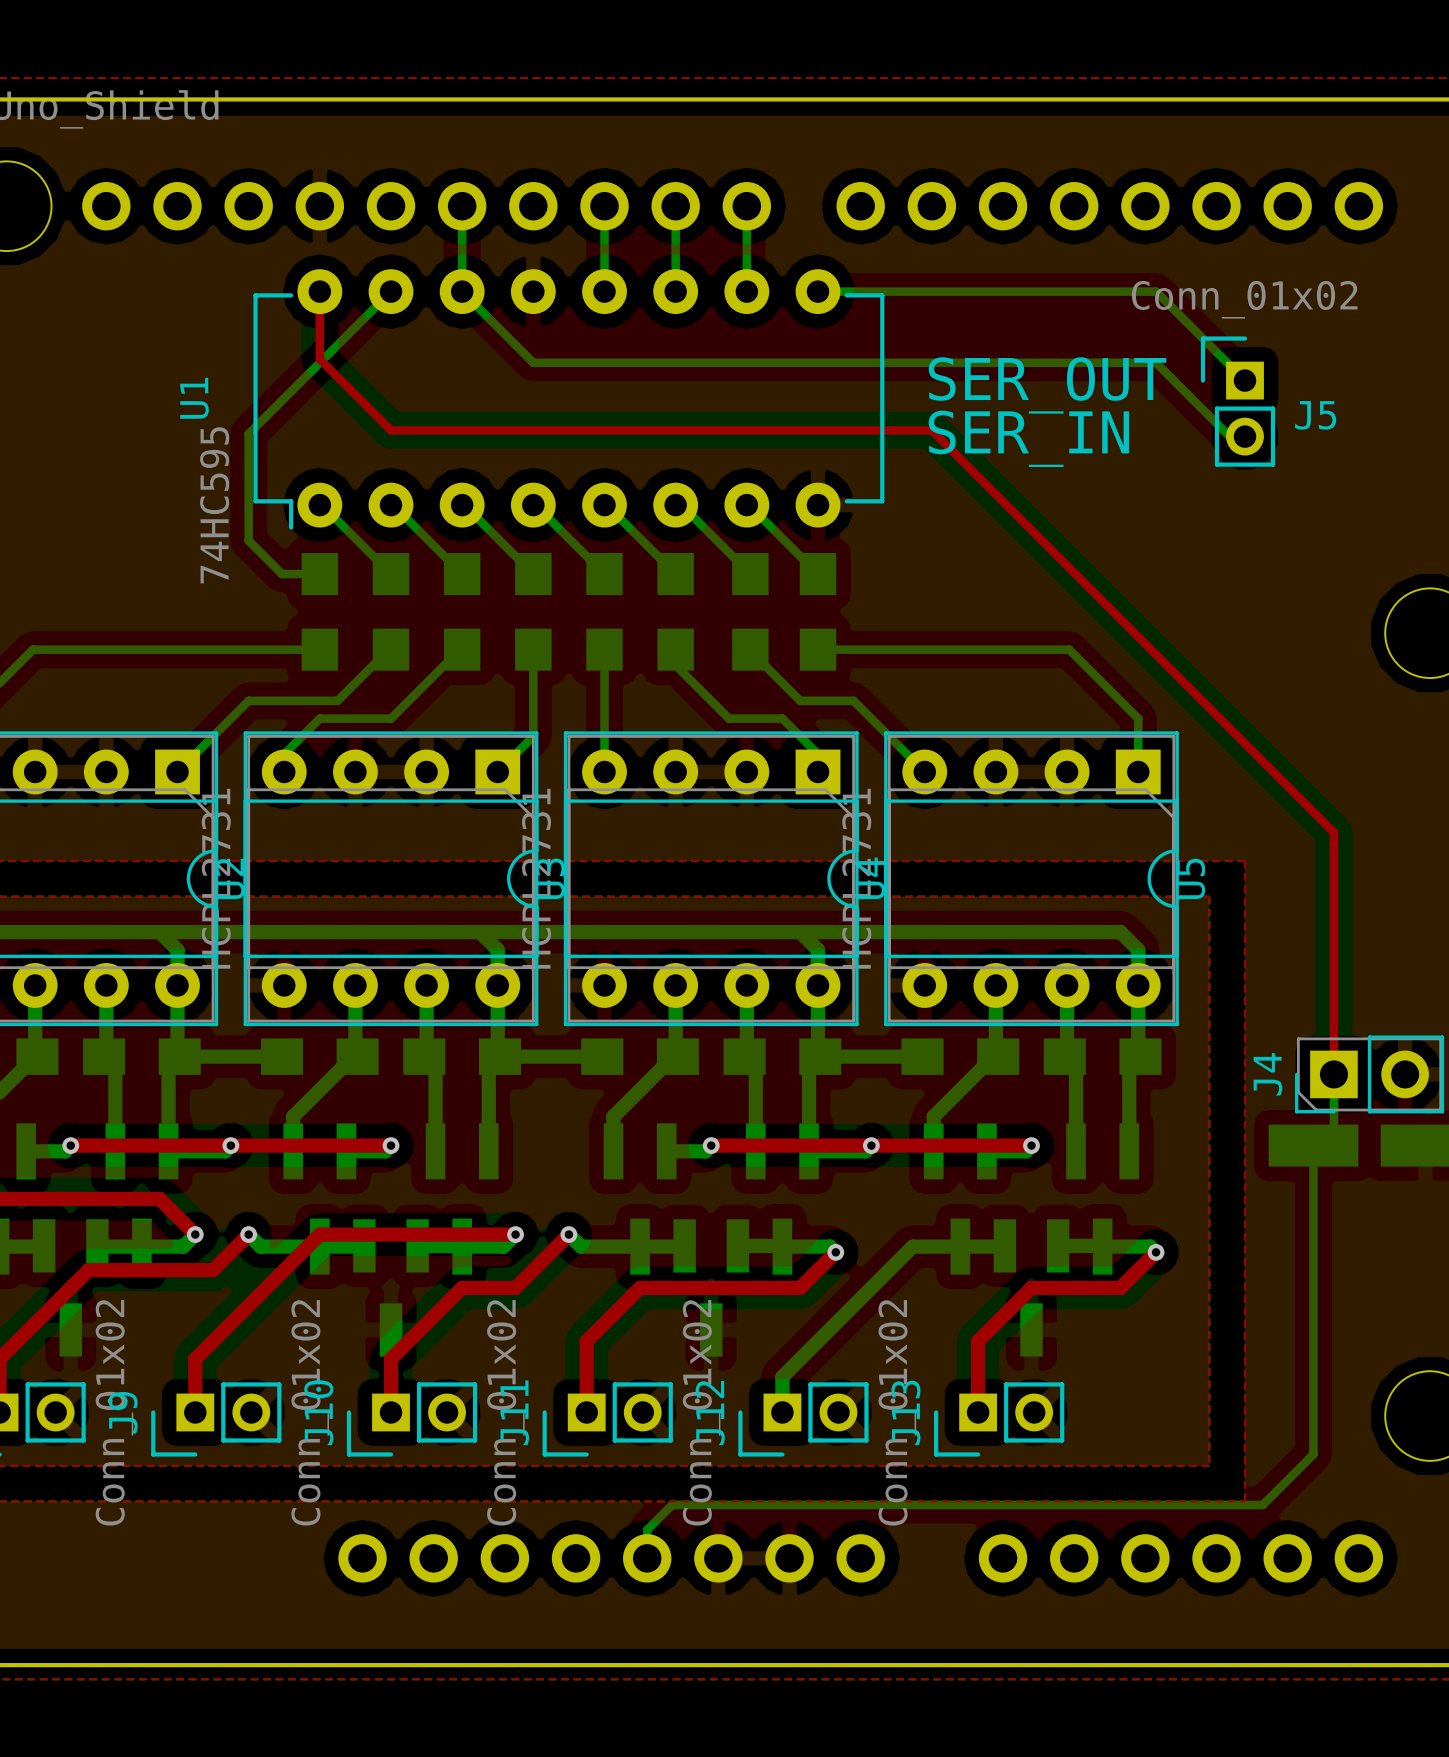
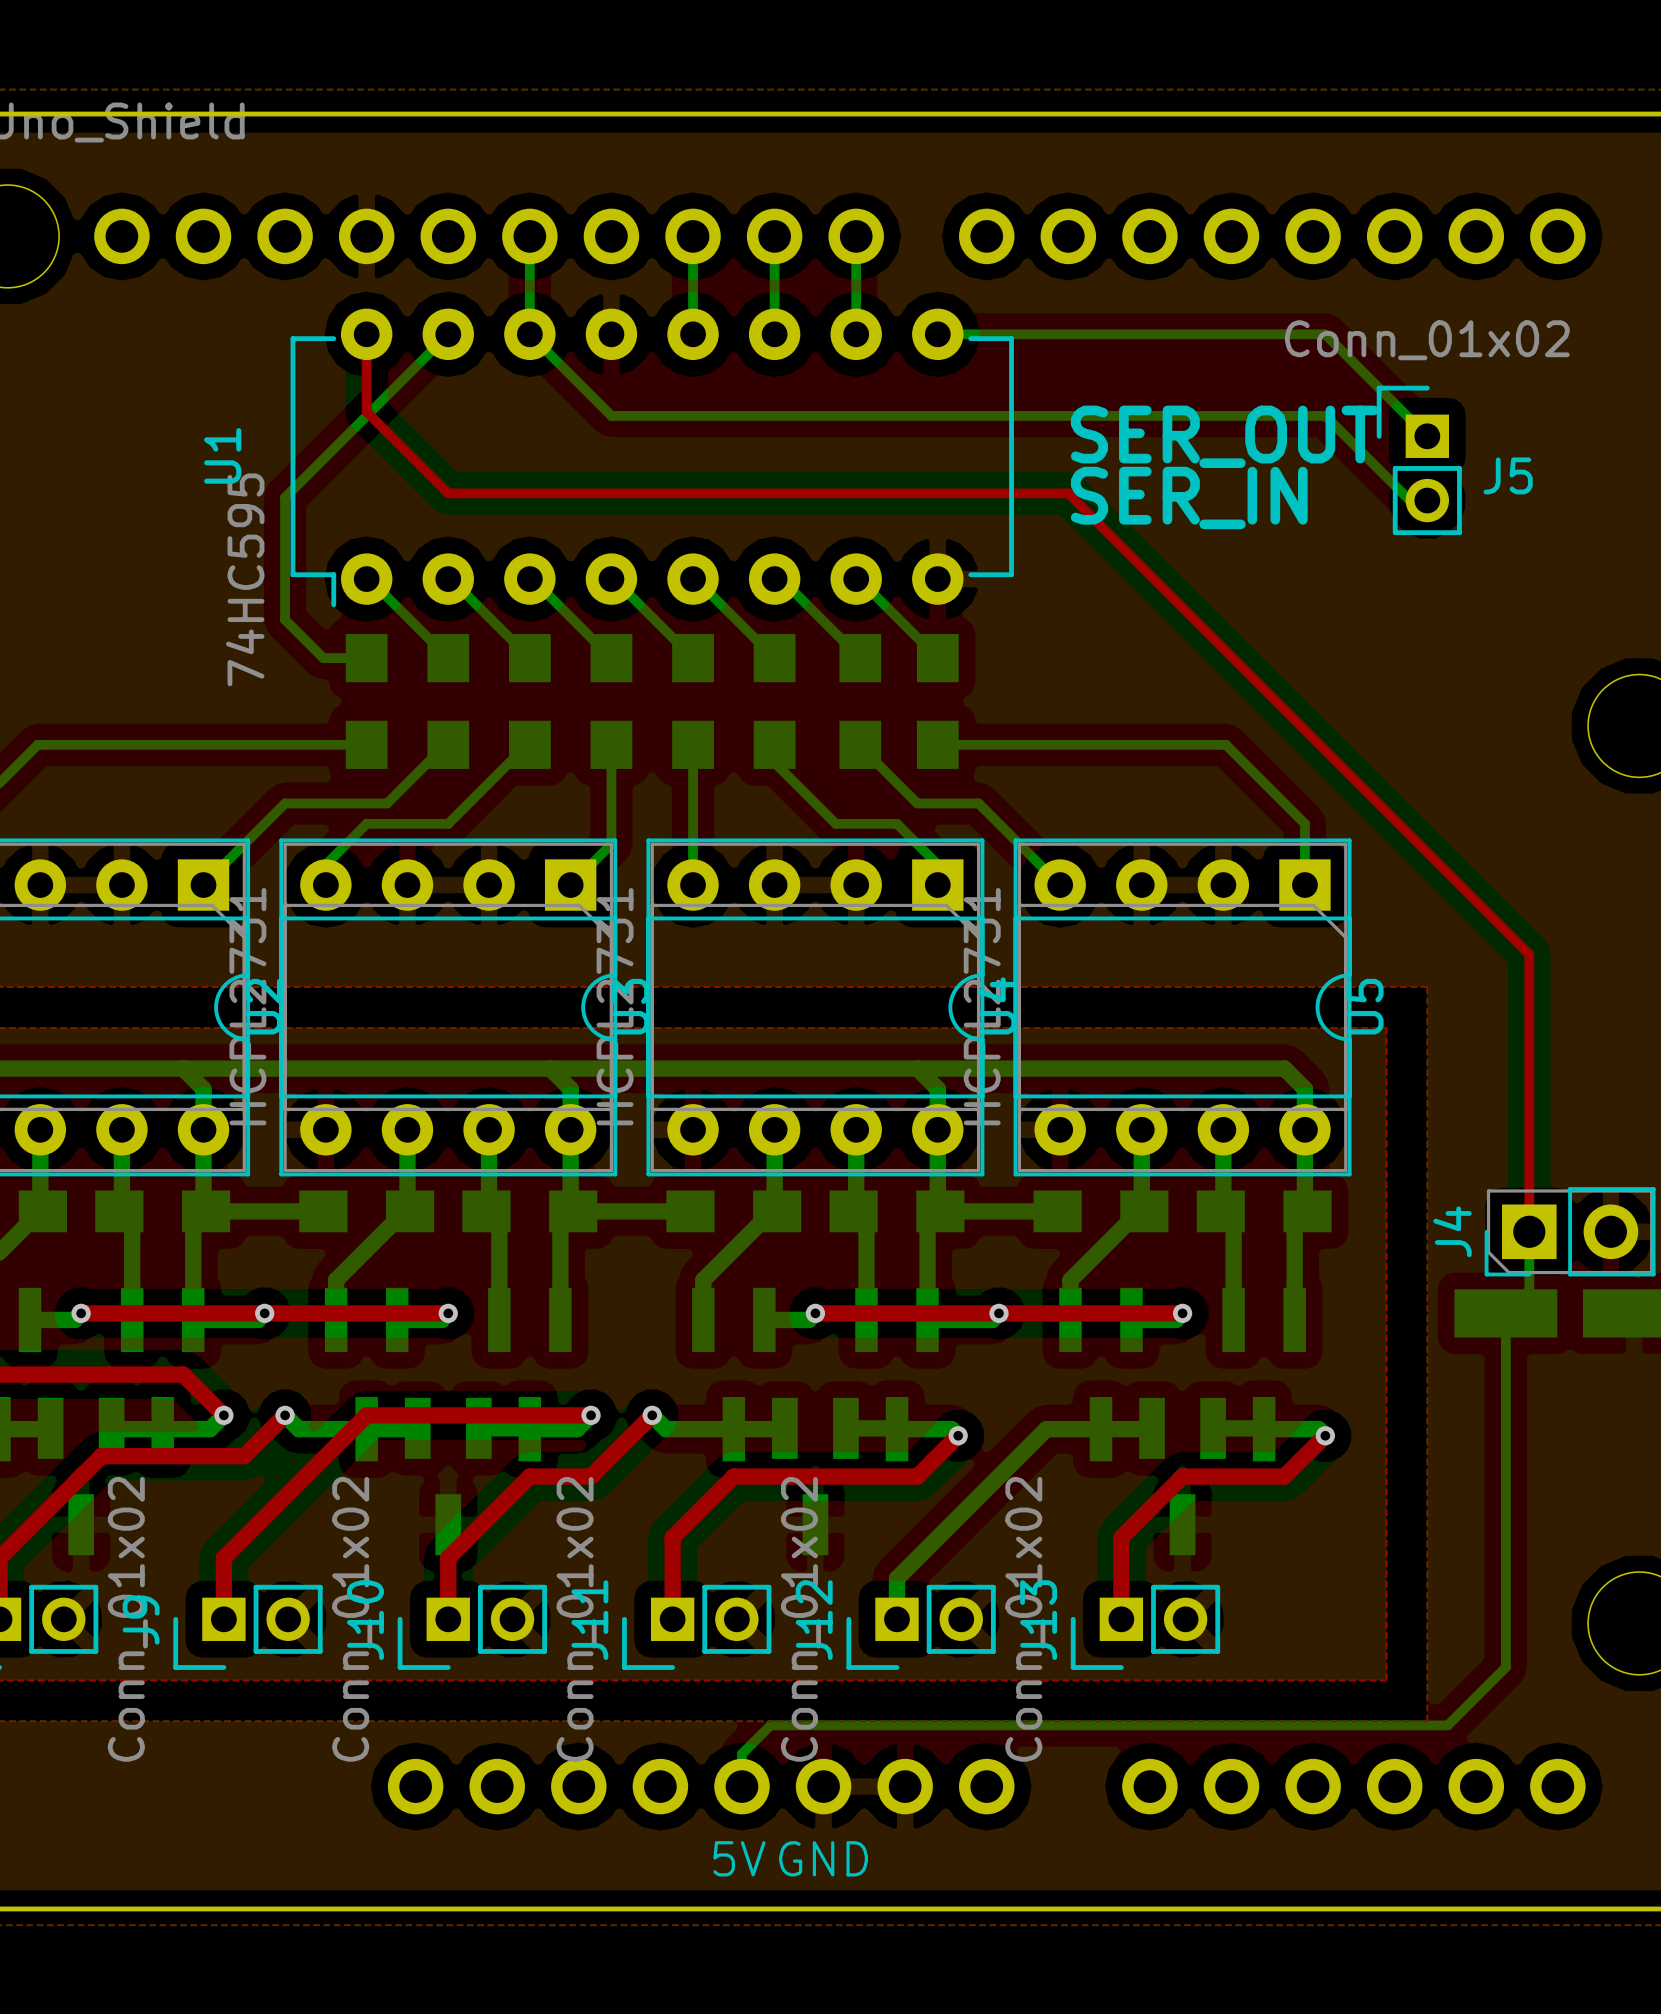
text: none -> 5V (739, 1858)
text: none -> GND (823, 1858)

